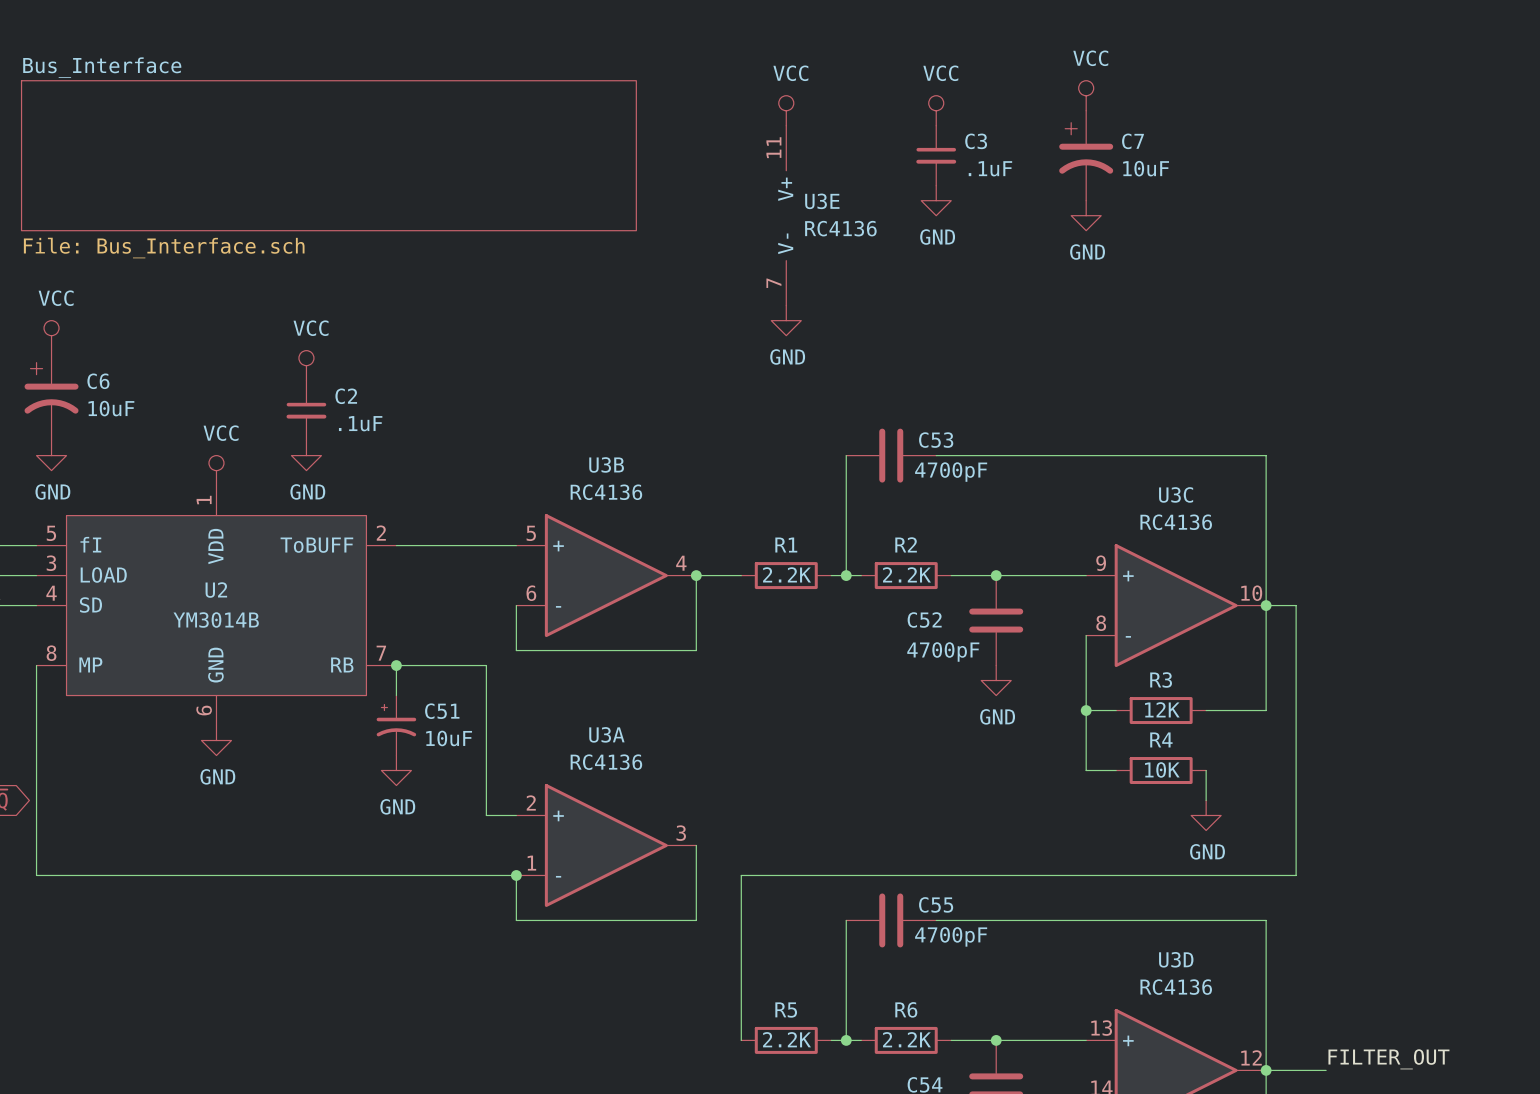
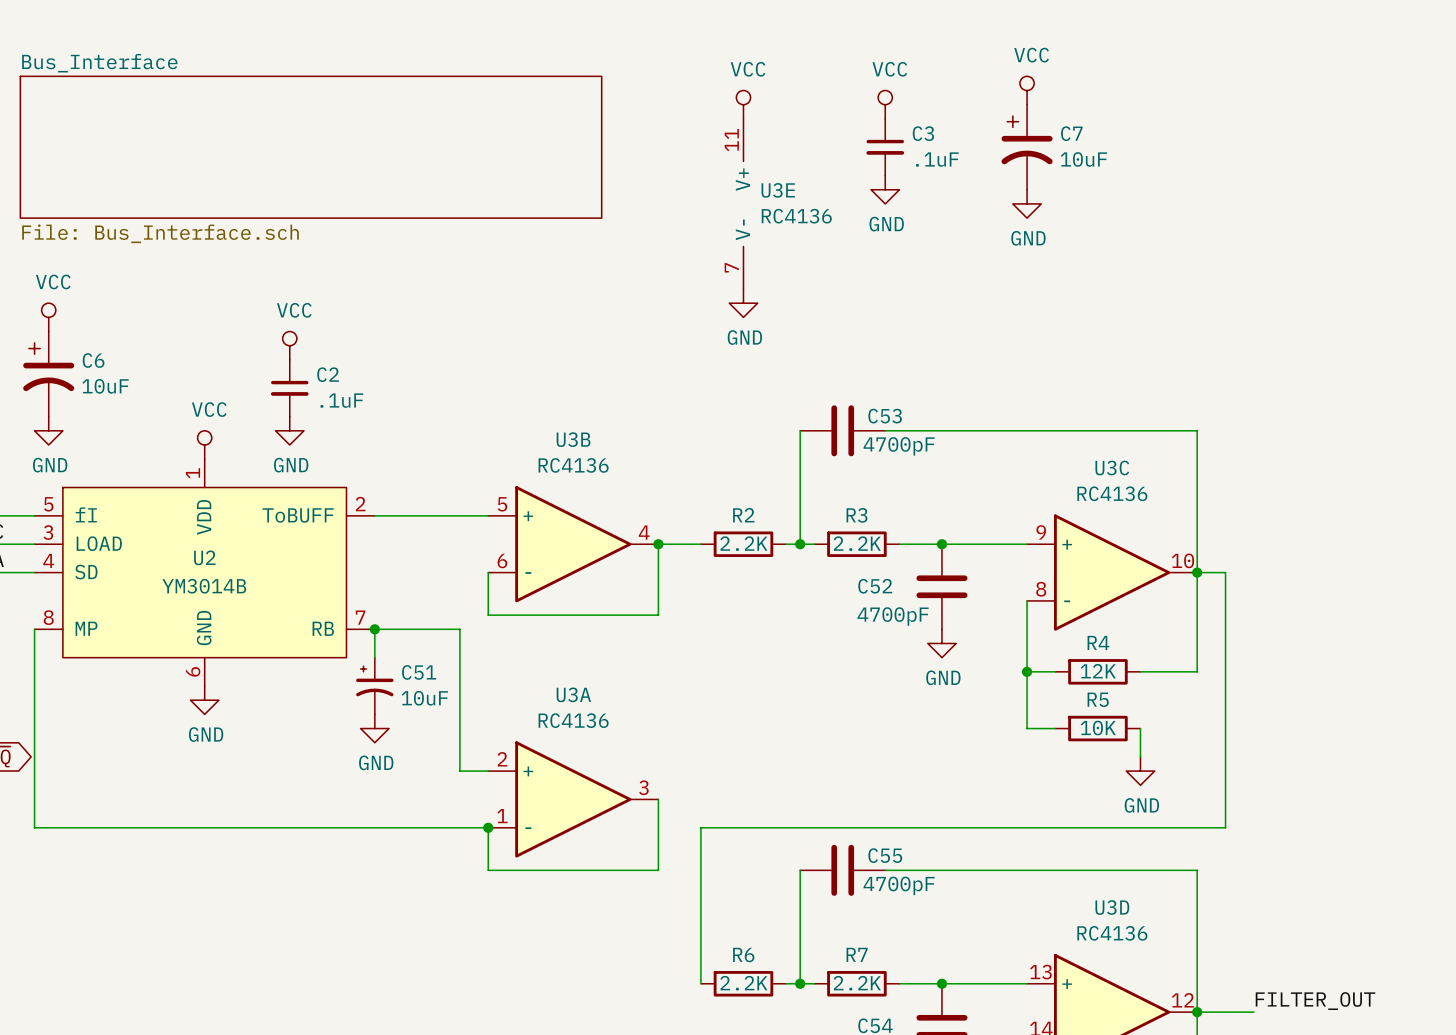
R2 name: R2 (906, 544) -> R3 (856, 515)
R1 name: R1 (786, 545) -> R2 (743, 515)
R3 name: R3 (1161, 679) -> R4 (1098, 642)
R4 name: R4 (1161, 739) -> R5 (1098, 699)
R6 name: R6 (906, 1009) -> R7 (857, 954)
R5 name: R5 (786, 1010) -> R6 (743, 955)

